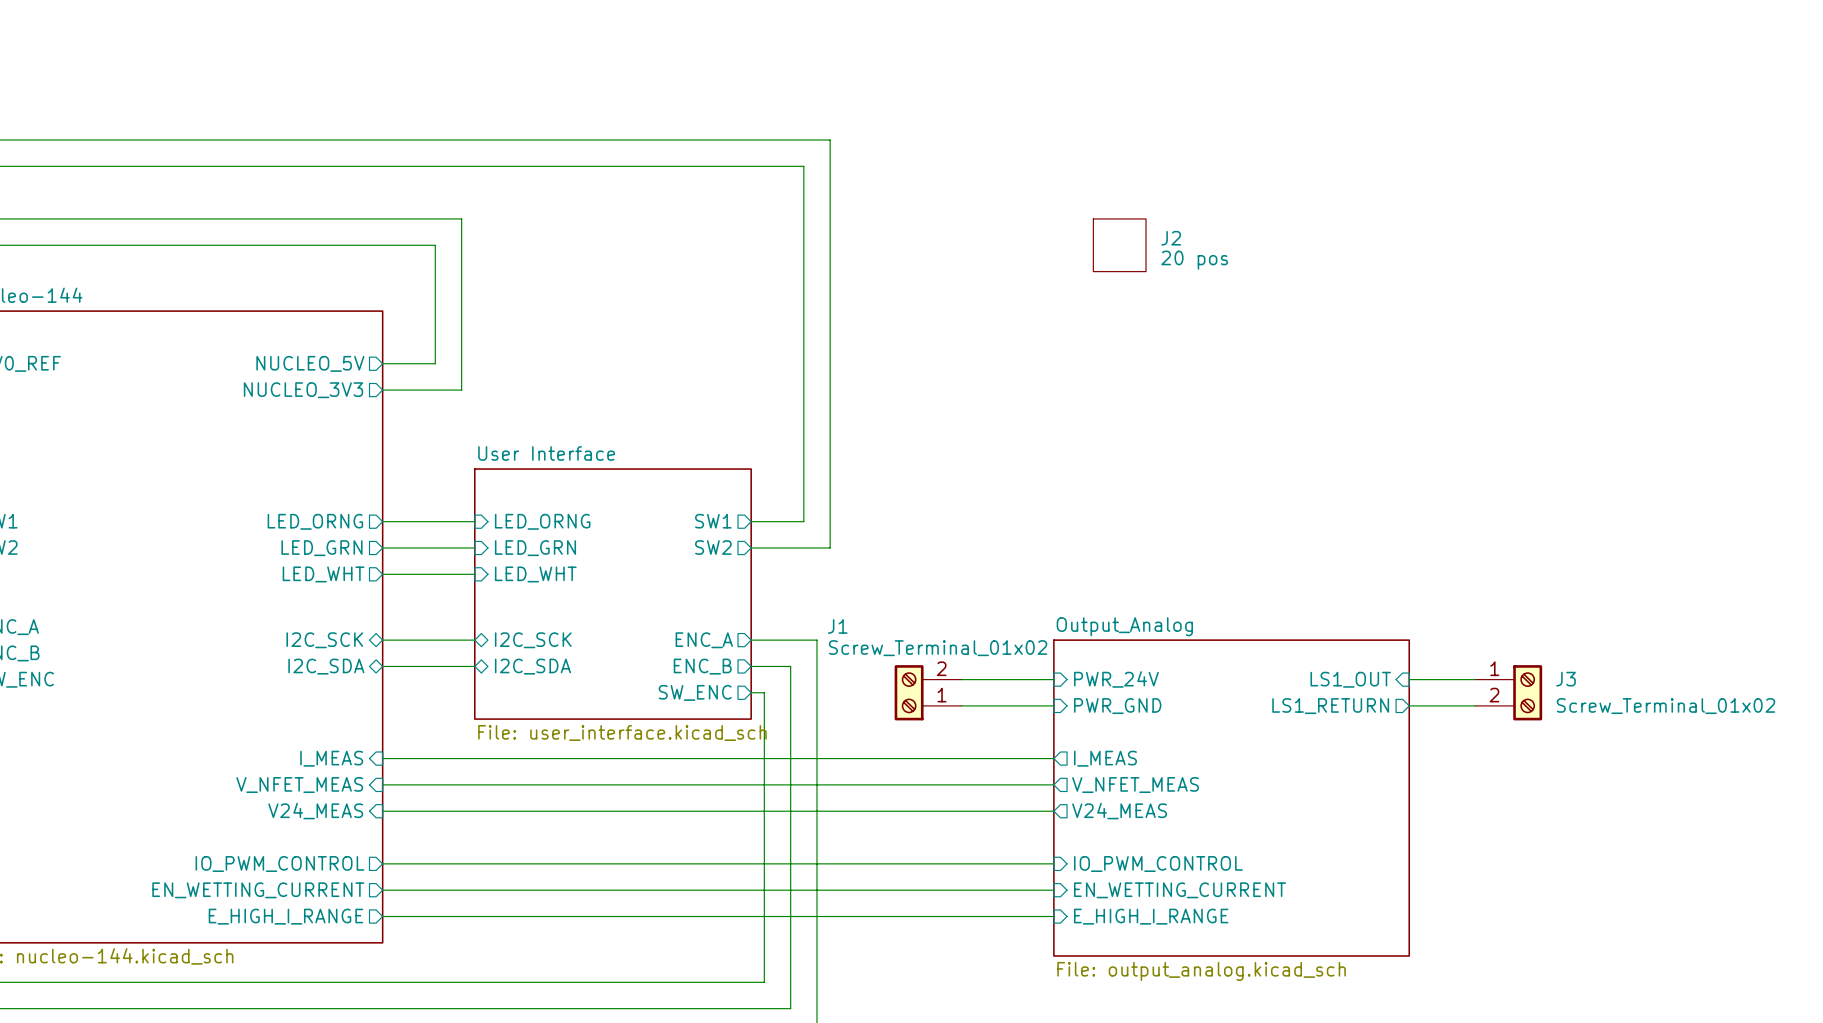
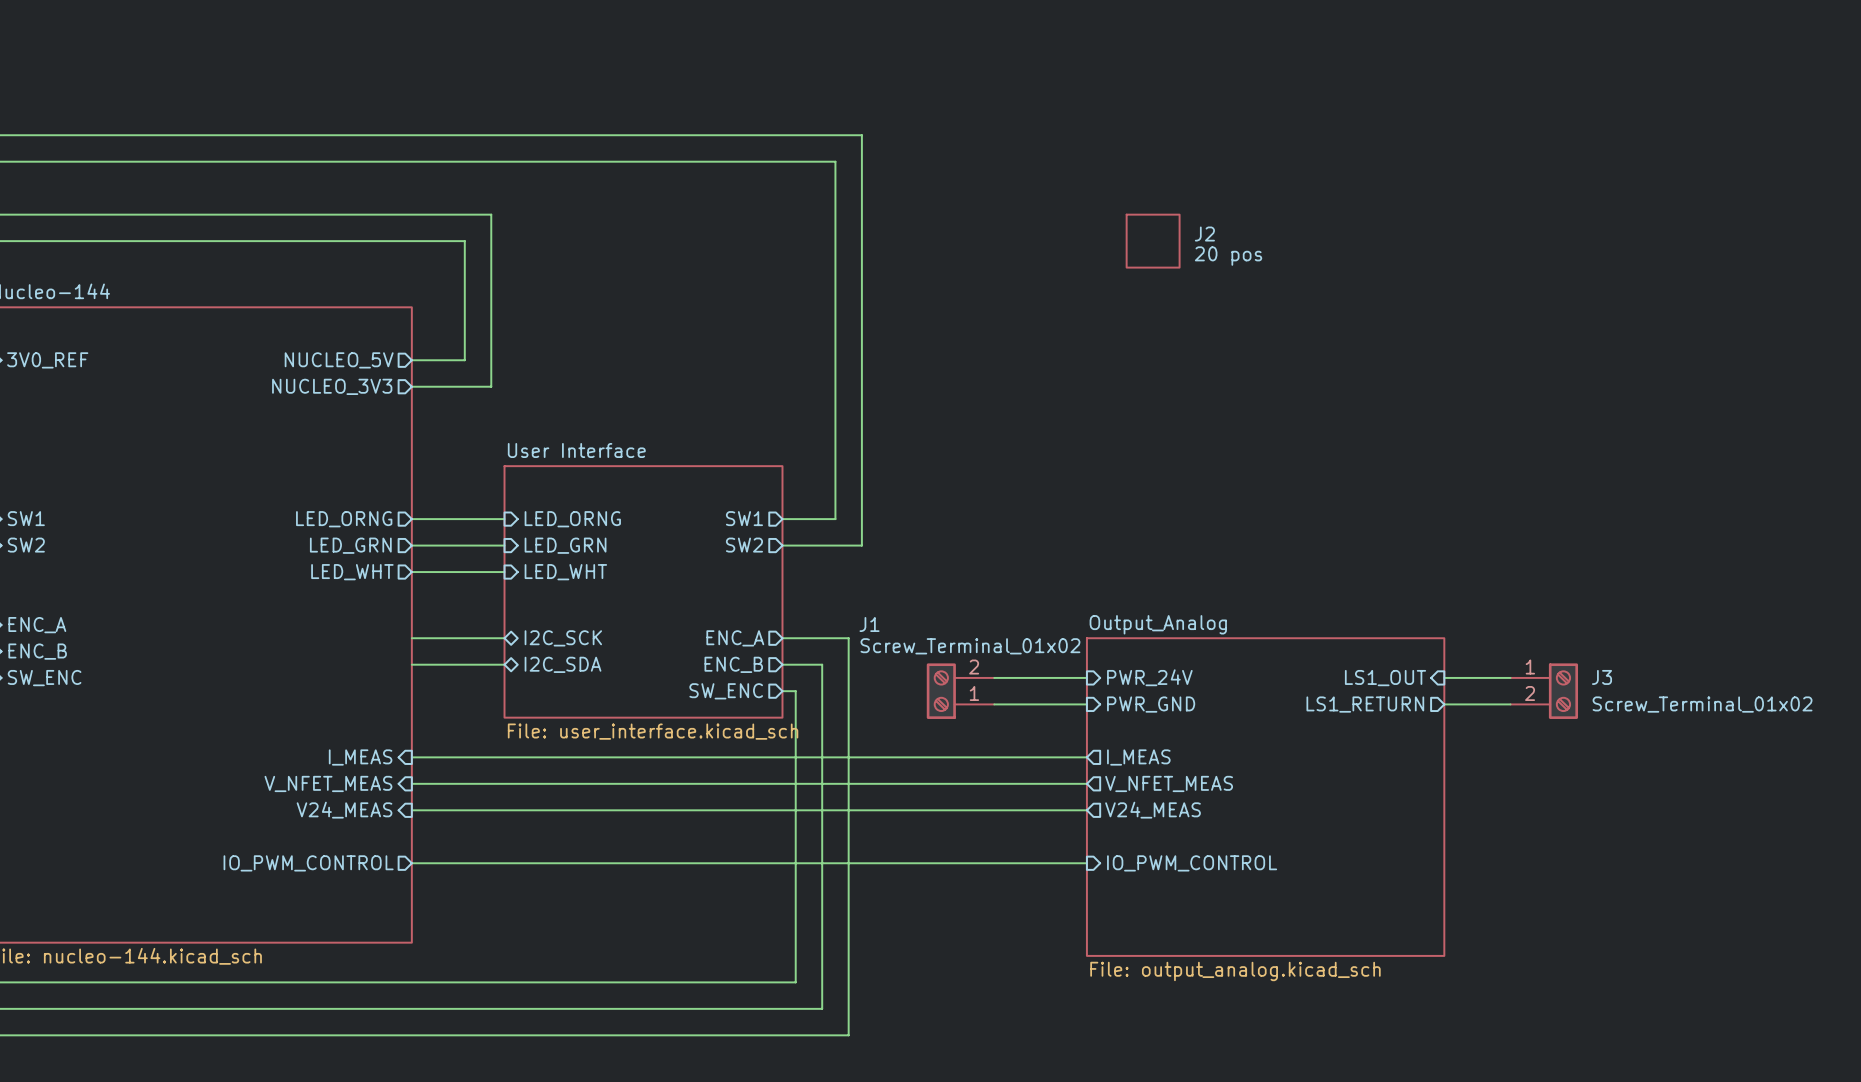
sheet pin: I2C_SCK (324, 640) -> none
sheet pin: I2C_SDA (326, 666) -> none
sheet pin: EN_WETTING_CURRENT (258, 890) -> none
wire: (382, 890) (1053, 890) -> none
sheet pin: EN_WETTING_CURRENT (1180, 890) -> none
sheet pin: E_HIGH_I_RANGE (285, 916) -> none
wire: (382, 916) (1053, 916) -> none
sheet pin: E_HIGH_I_RANGE (1151, 916) -> none

